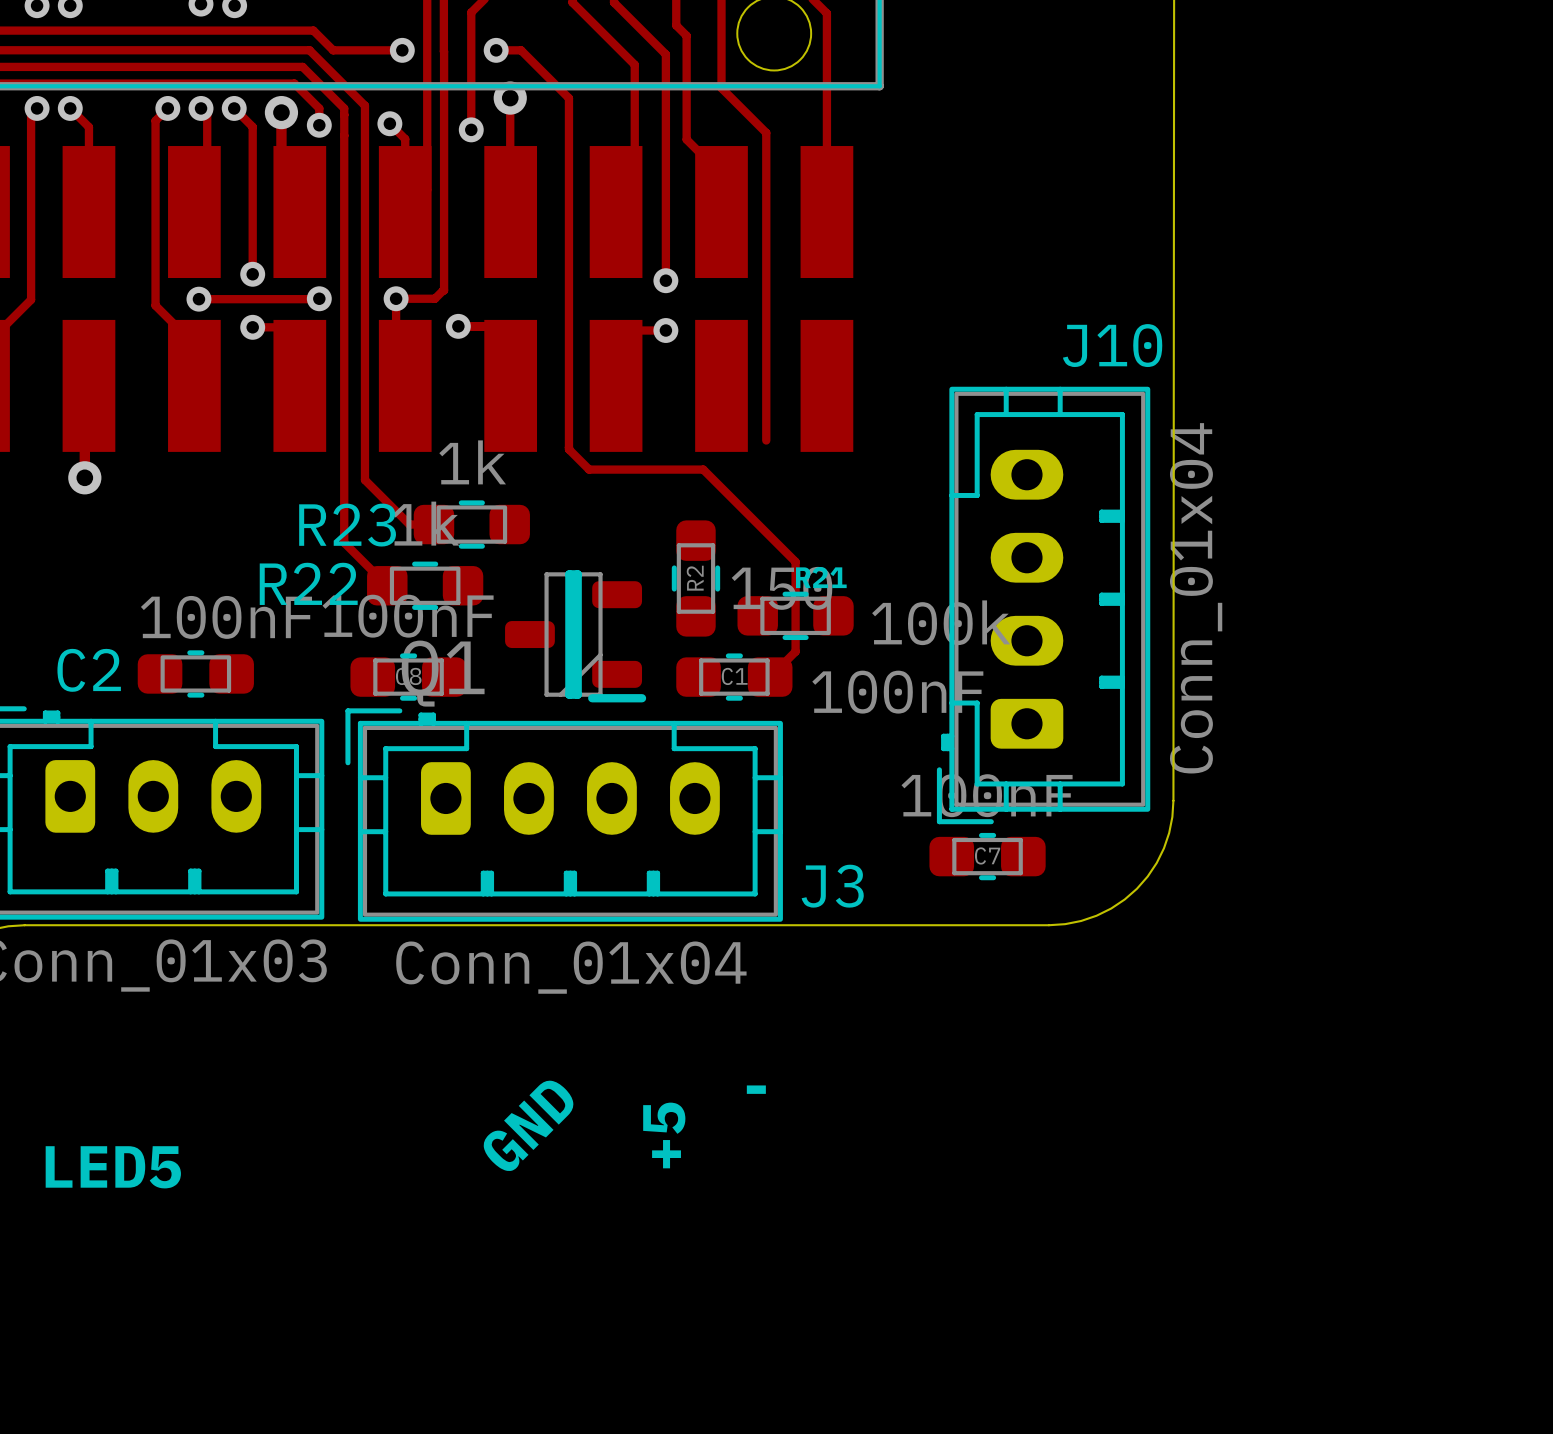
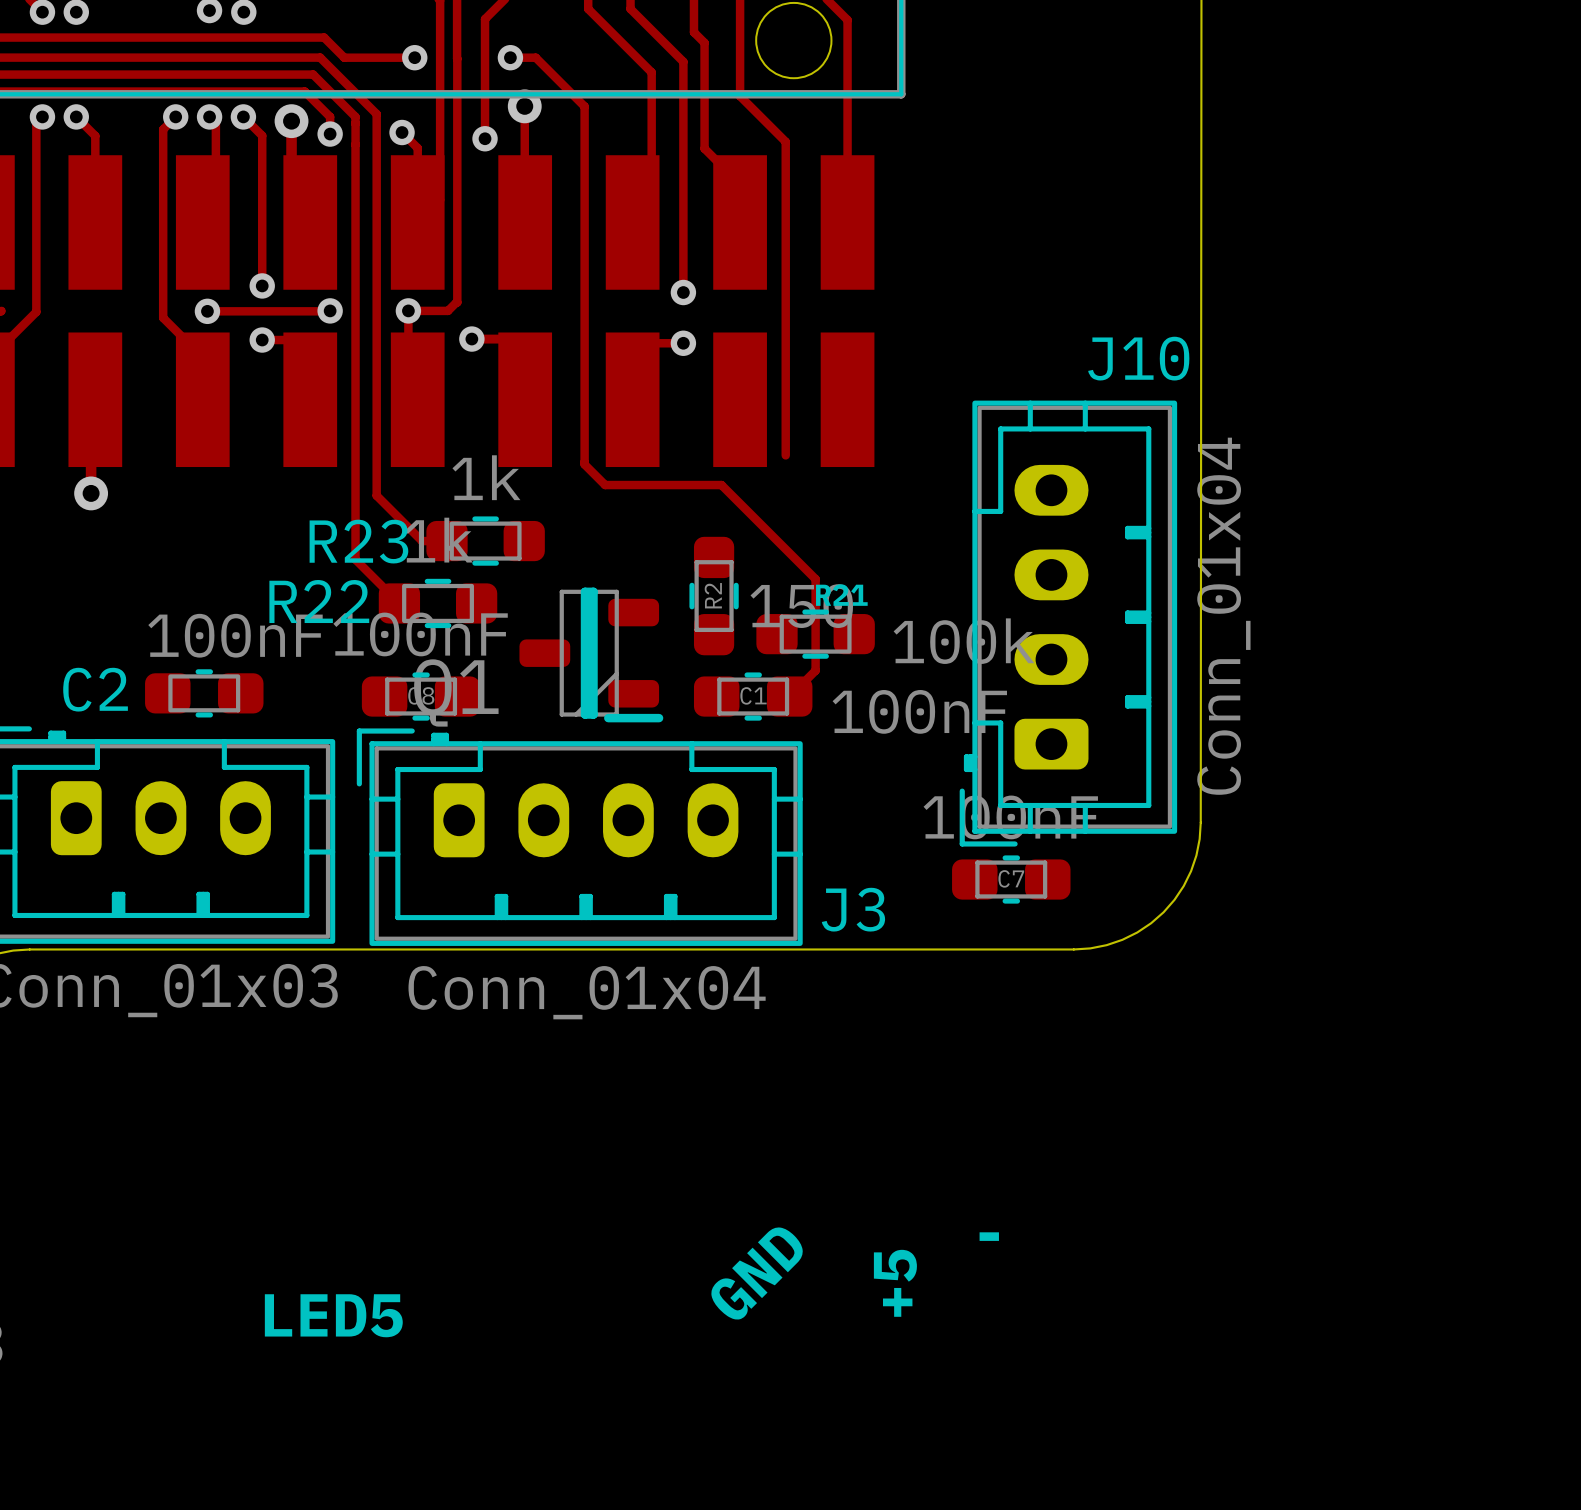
text position: - (756, 1089) -> - (989, 1236)
text position: GND (528, 1125) -> GND (756, 1273)
text position: +5 (664, 1135) -> +5 (895, 1283)
text position: LED5 (113, 1167) -> LED5 (333, 1315)

